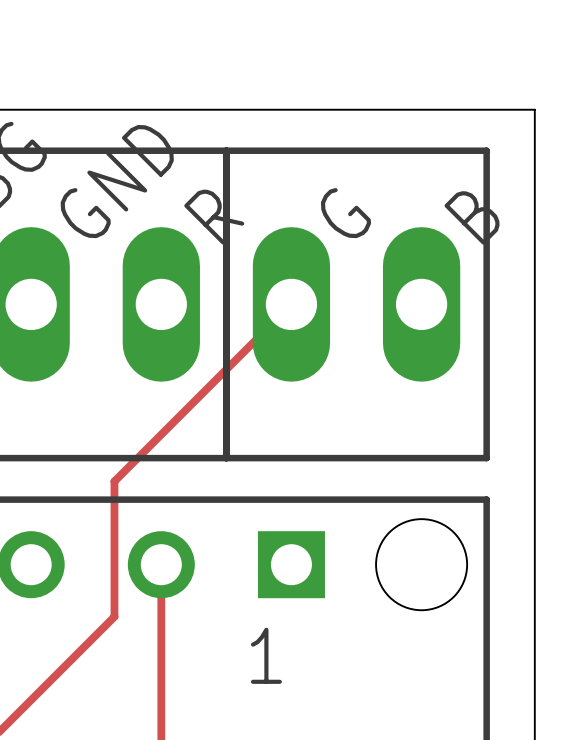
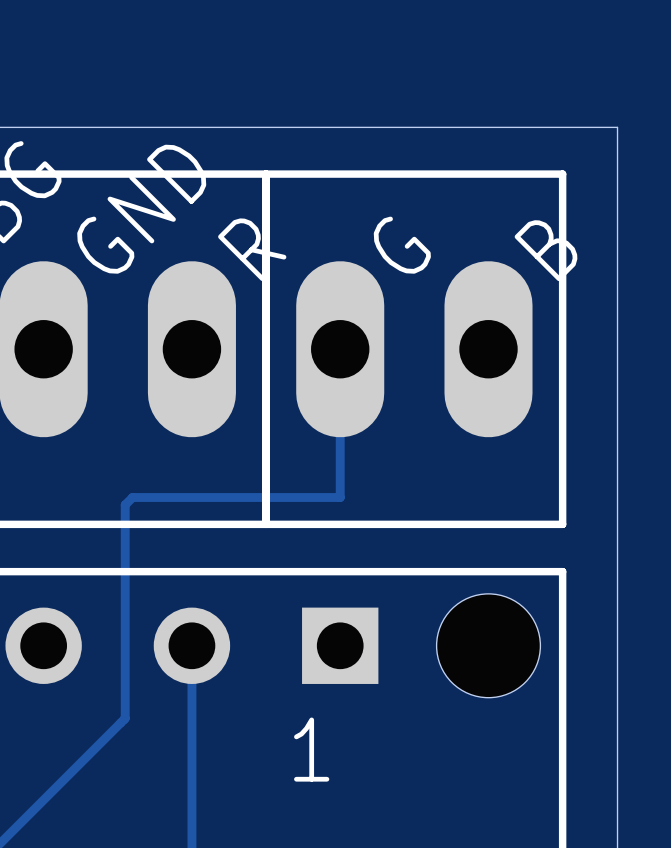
track: (291, 304) (114, 481) (114, 616) (102, 628) -> (340, 349) (340, 497) (132, 497) (125, 504) (125, 718)

